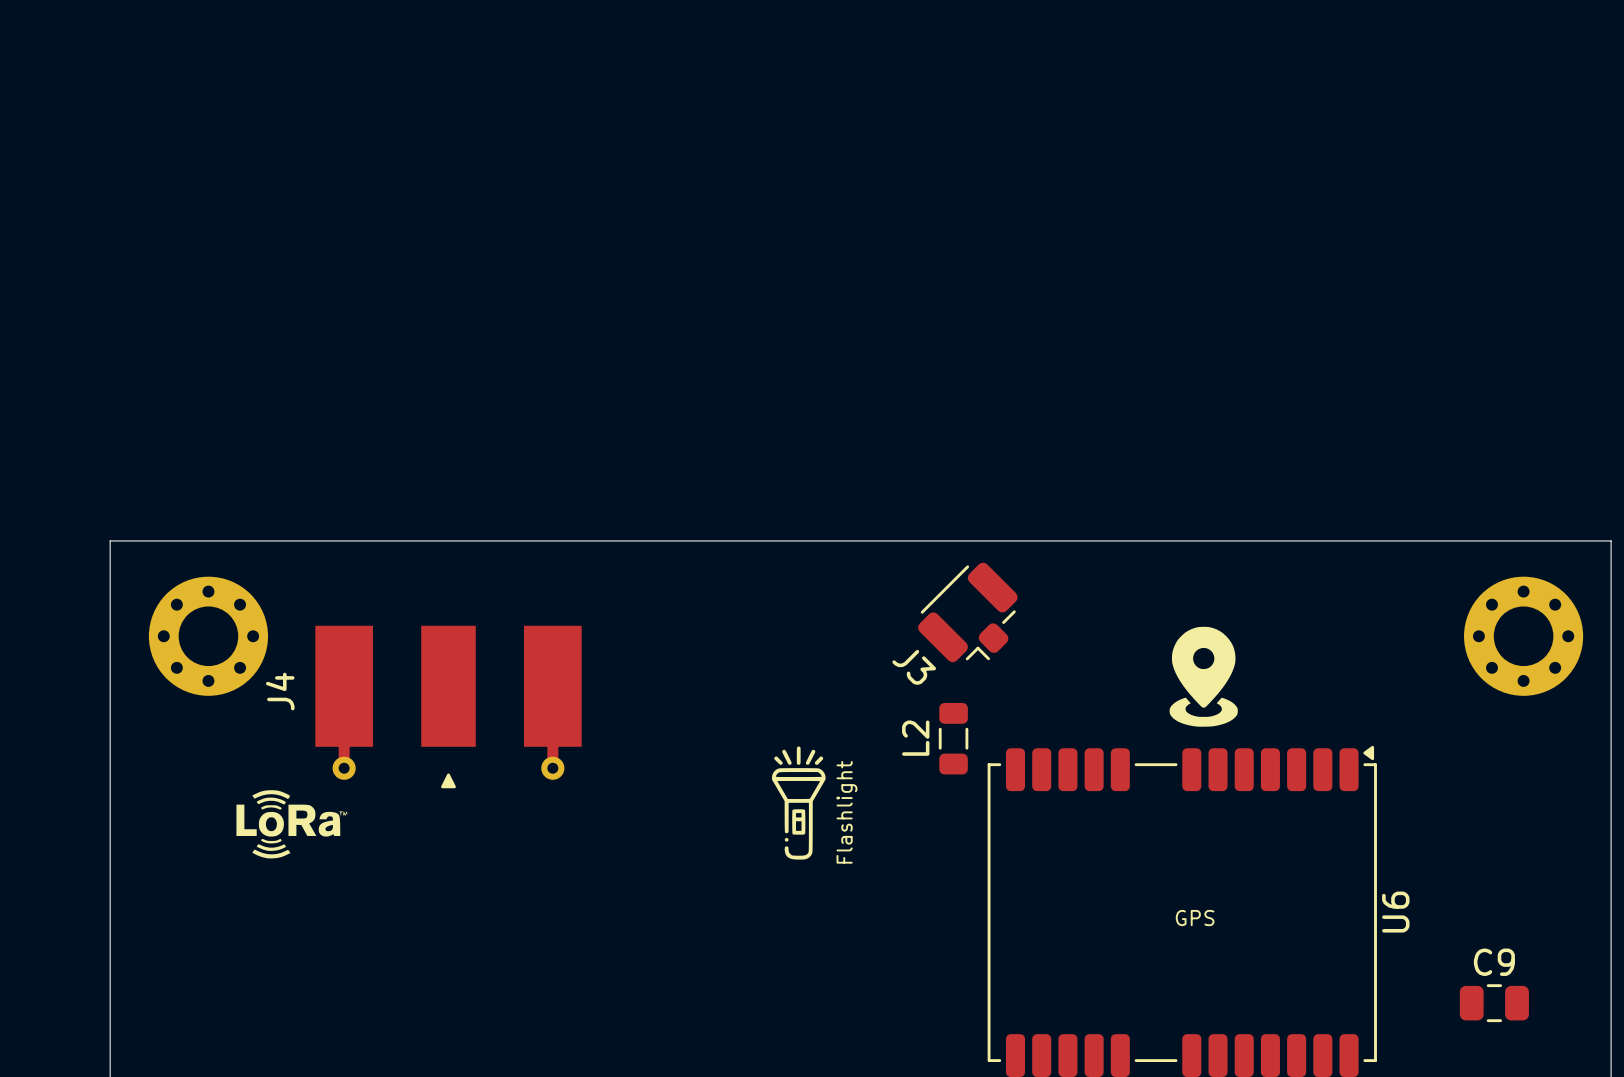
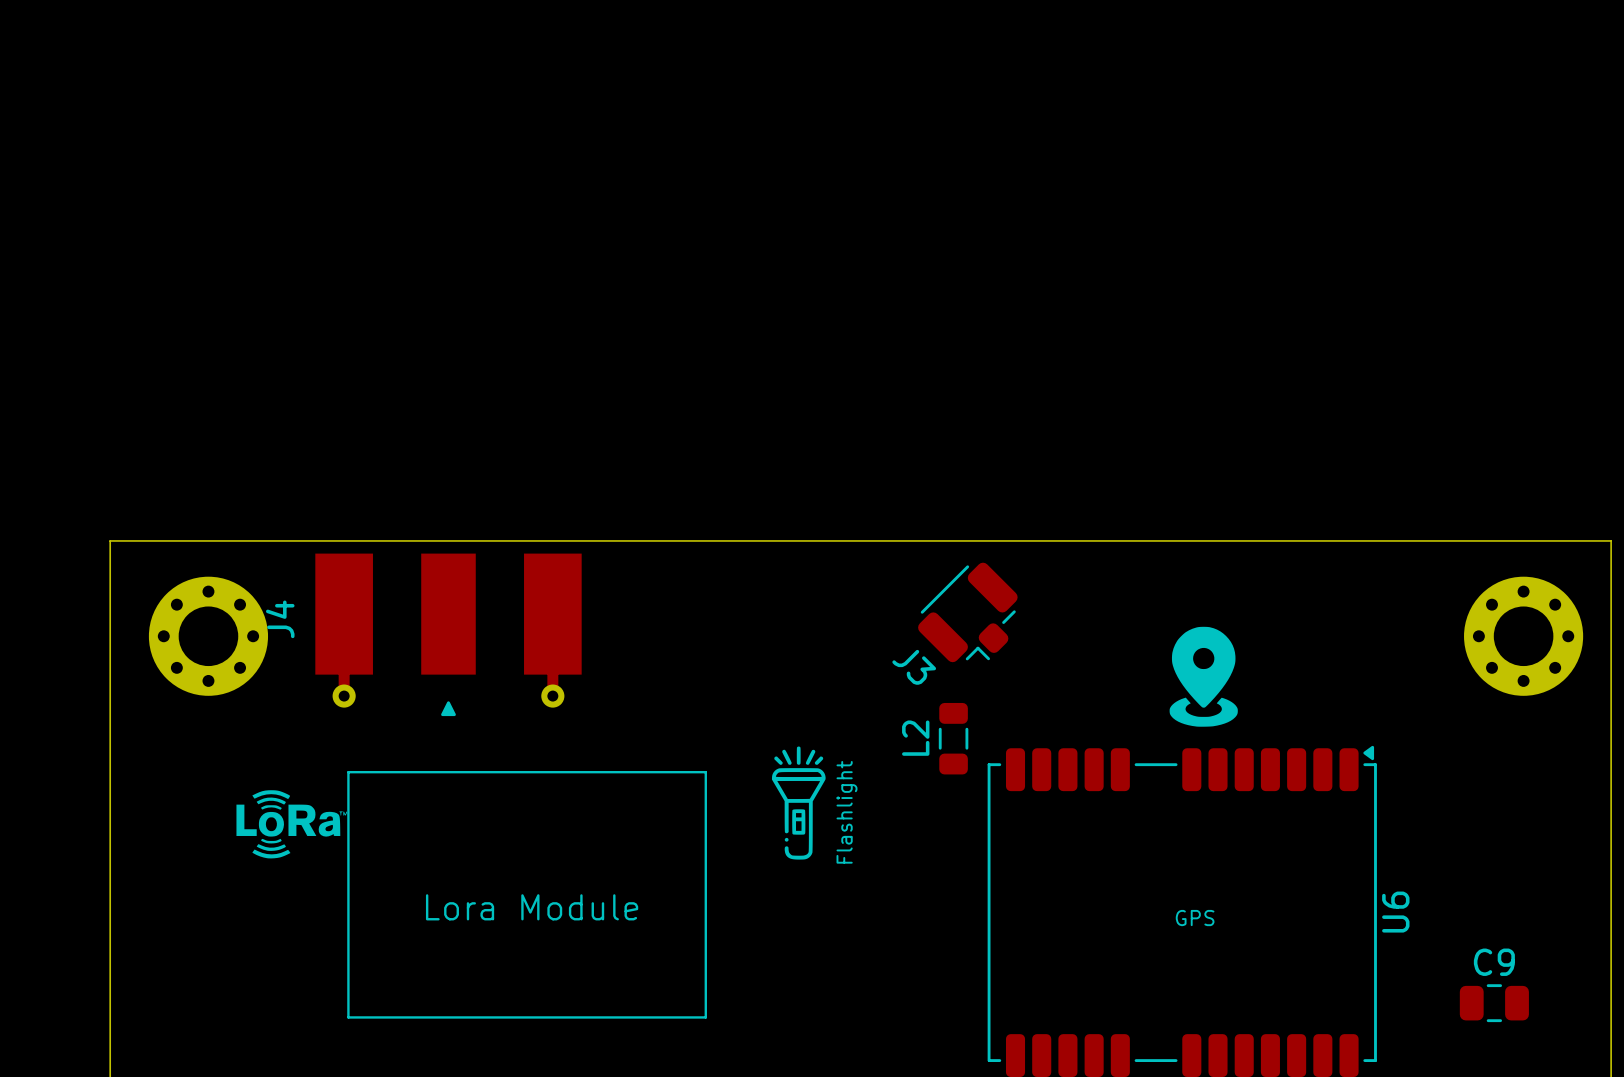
J4 position: (448, 707) -> (448, 634)
line: none -> (348, 772) (705, 772) (705, 1017) (348, 1017) (348, 772)
text: none -> Lora Module (532, 907)

